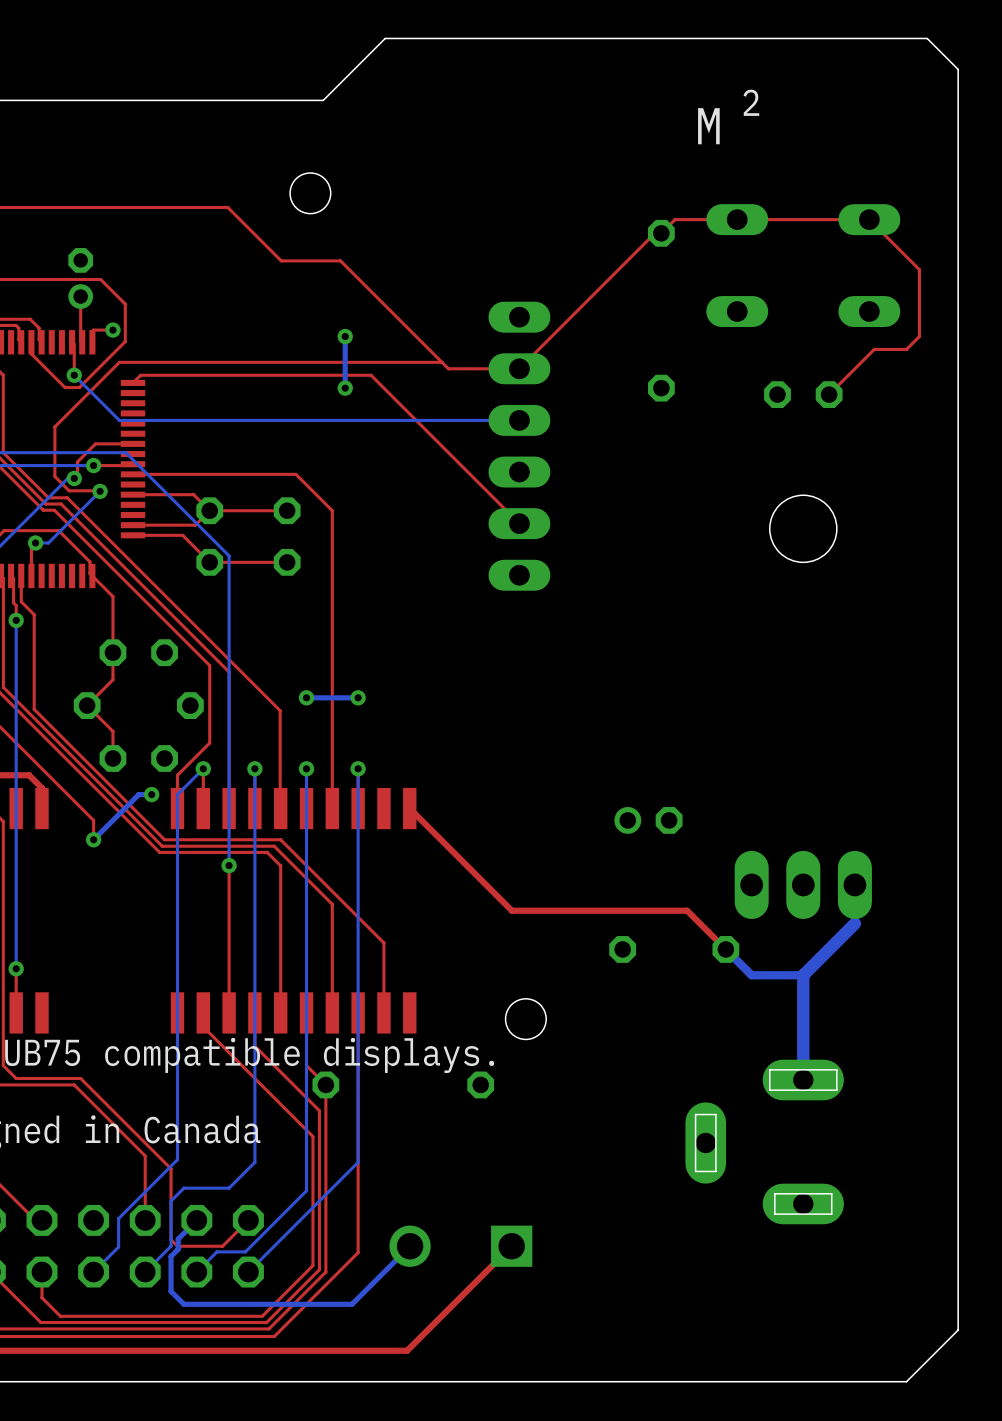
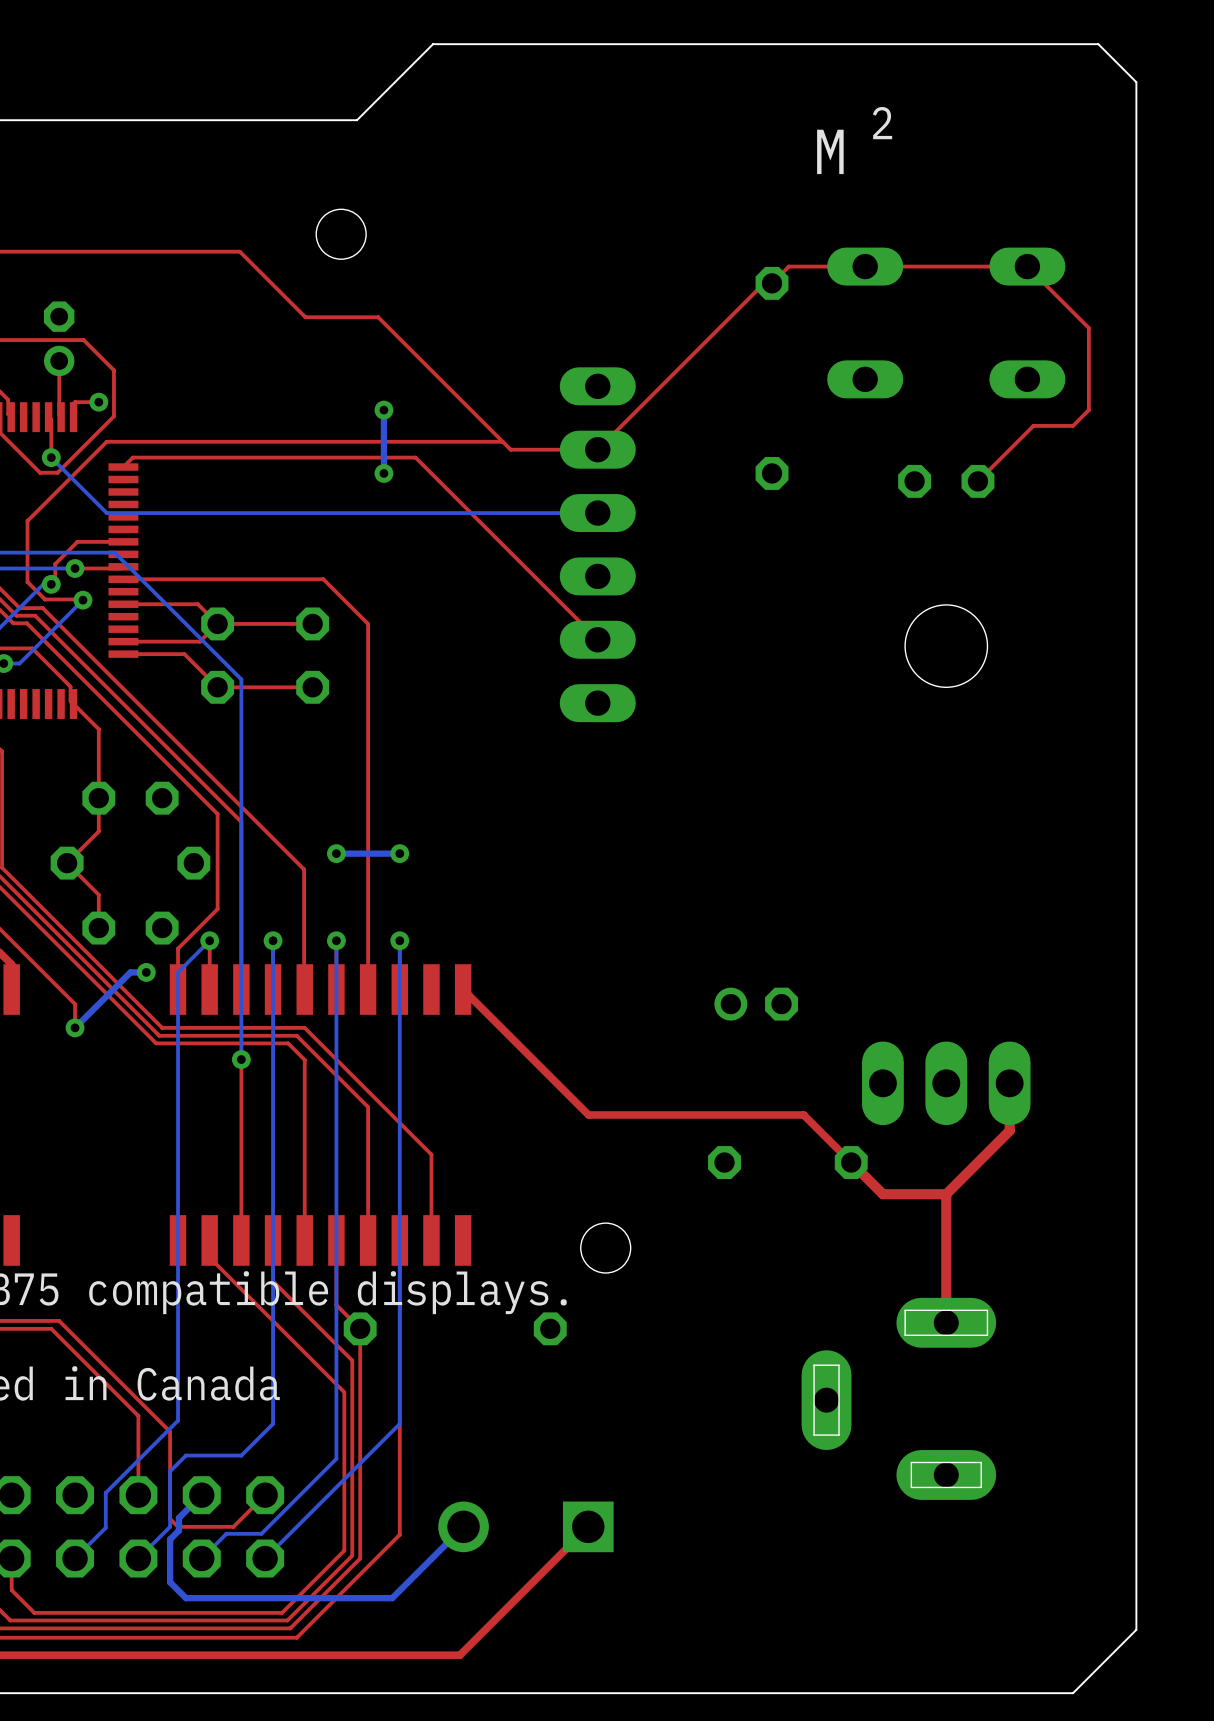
top track: none -> (1009, 1083) (1009, 1130) (946, 1194)
bottom track: (854, 884) (854, 923) (803, 975) -> none
top track: none -> (851, 1162) (882, 1194) (946, 1194)
bottom track: (725, 949) (751, 975) (803, 975) -> none
top track: none -> (946, 1194) (946, 1322)
bottom track: (803, 975) (803, 1080) -> none

